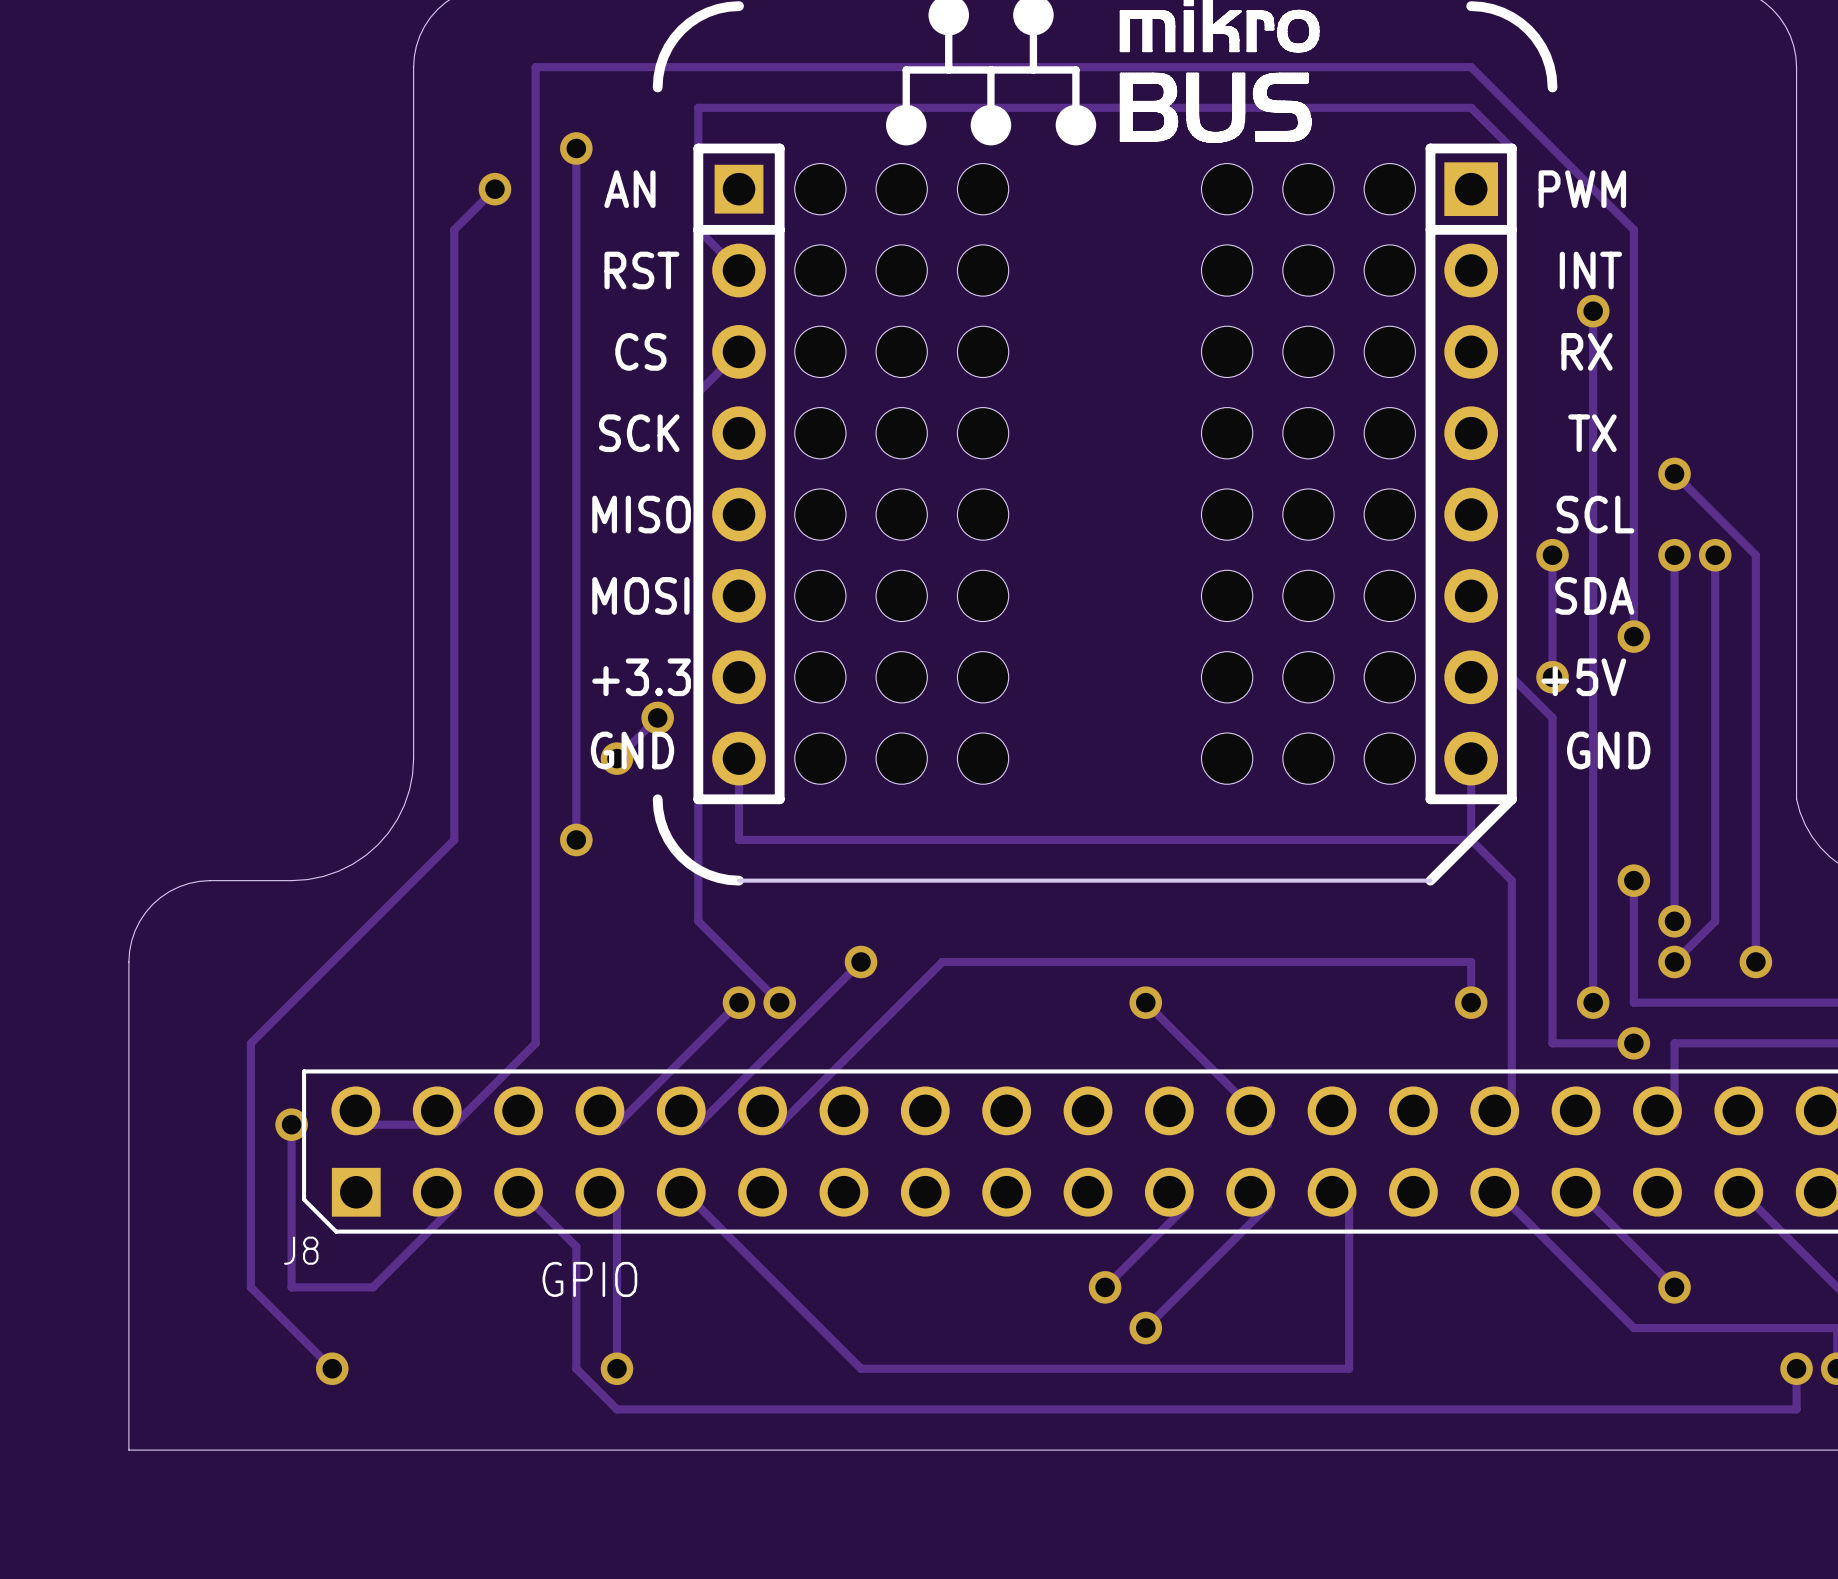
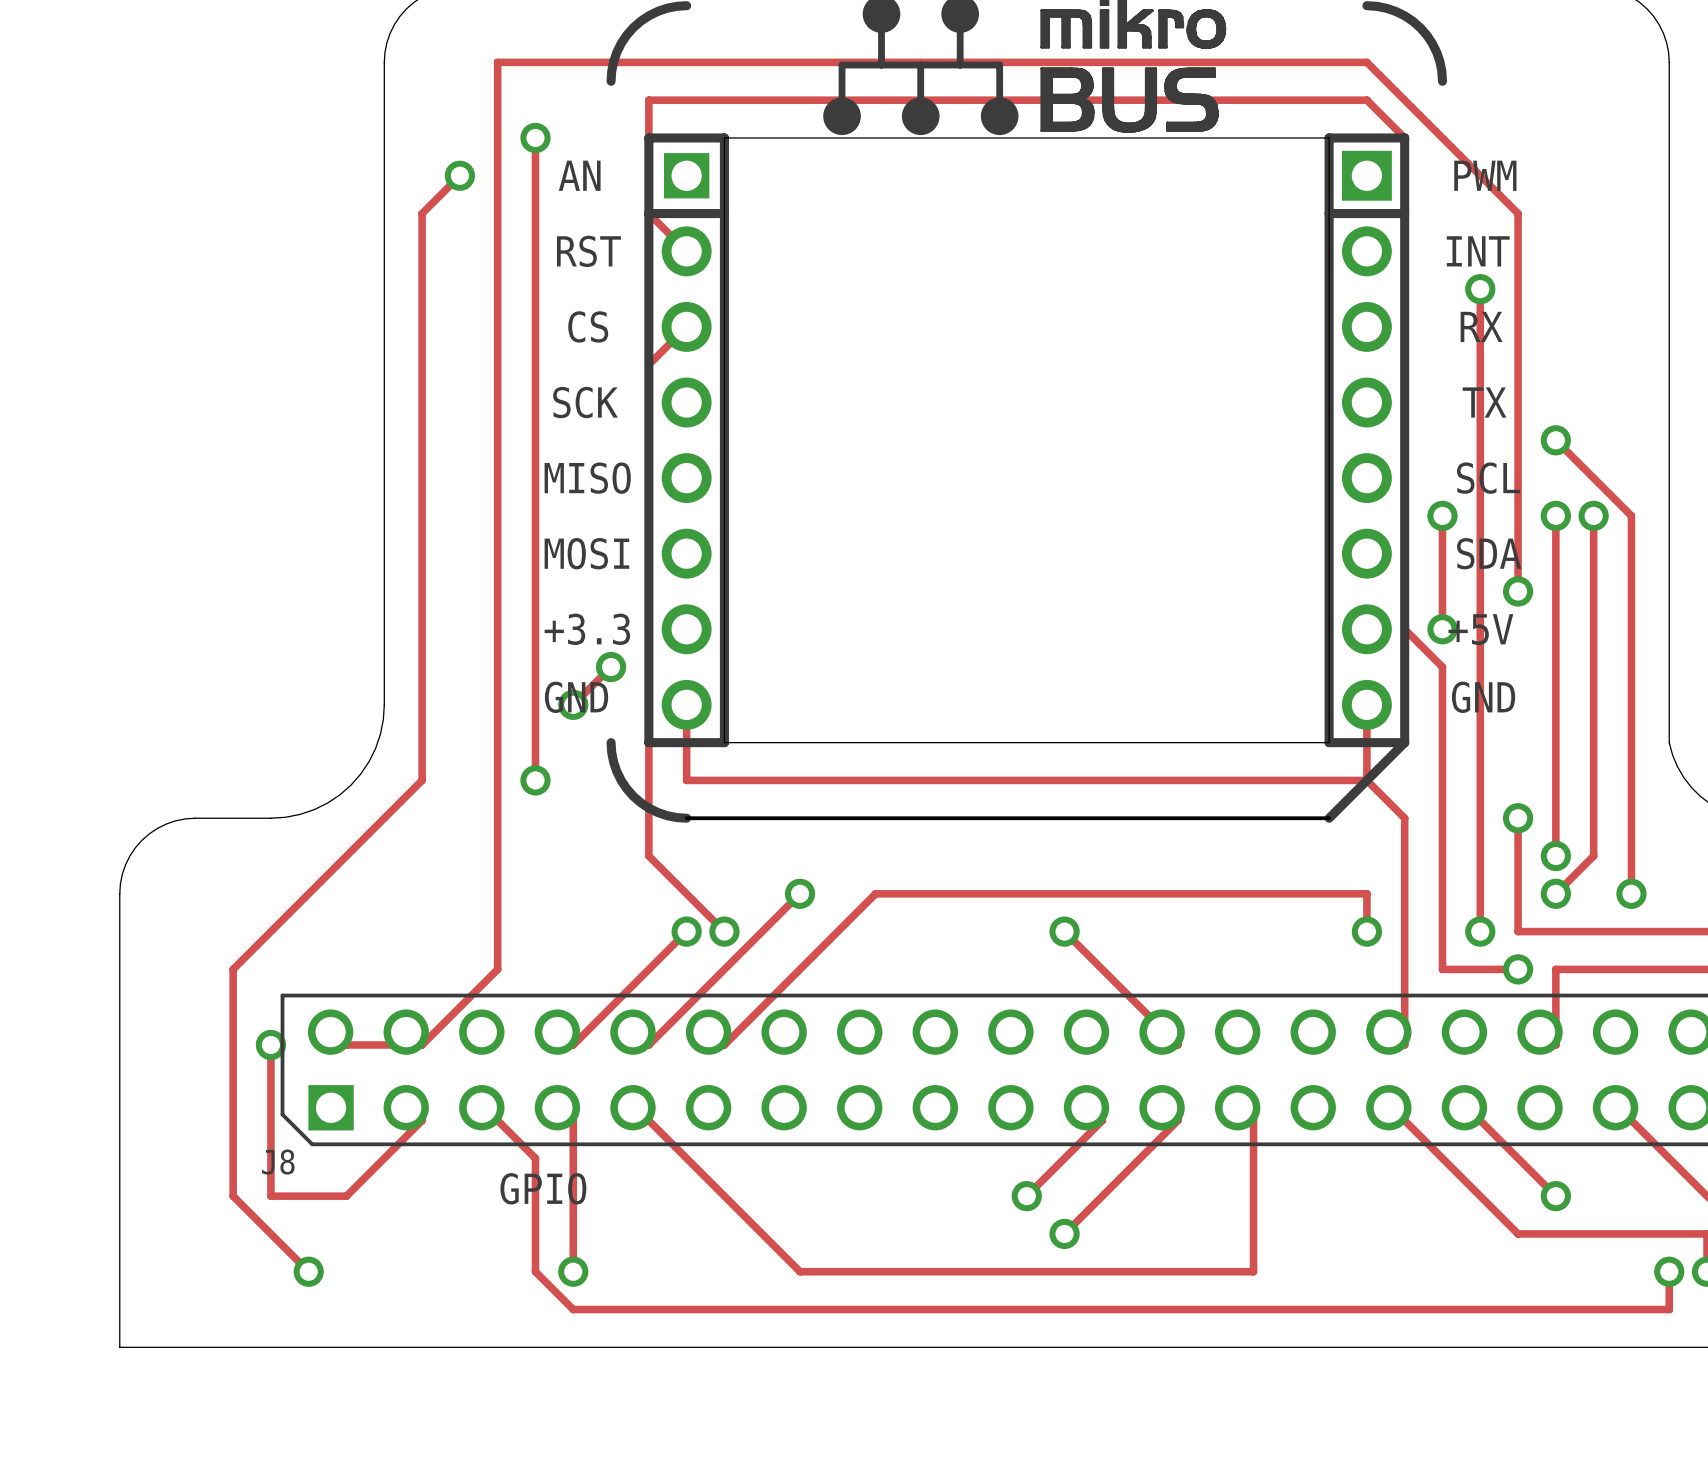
board edge: none -> (724, 137) (1329, 137) (1329, 742) (724, 742) (724, 137)
hole: (820, 189) -> none
hole: (901, 189) -> none
hole: (983, 189) -> none
hole: (1227, 189) -> none
hole: (1308, 189) -> none
hole: (1389, 189) -> none
hole: (820, 270) -> none
hole: (901, 270) -> none
hole: (983, 270) -> none
hole: (1227, 270) -> none
hole: (1308, 270) -> none
hole: (1389, 270) -> none
hole: (820, 351) -> none
hole: (901, 351) -> none
hole: (983, 351) -> none
hole: (1227, 351) -> none
hole: (1308, 351) -> none
hole: (1389, 351) -> none
hole: (820, 433) -> none
hole: (901, 433) -> none
hole: (983, 433) -> none
hole: (1227, 433) -> none
hole: (1308, 433) -> none
hole: (1389, 433) -> none
hole: (820, 514) -> none
hole: (901, 514) -> none
hole: (983, 514) -> none
hole: (1227, 514) -> none
hole: (1308, 514) -> none
hole: (1389, 514) -> none
hole: (820, 595) -> none
hole: (901, 595) -> none
hole: (983, 595) -> none
hole: (1227, 595) -> none
hole: (1308, 595) -> none
hole: (1389, 595) -> none
hole: (820, 677) -> none
hole: (901, 677) -> none
hole: (983, 677) -> none
hole: (1227, 677) -> none
hole: (1308, 677) -> none
hole: (1389, 677) -> none
hole: (820, 758) -> none
hole: (901, 758) -> none
hole: (983, 758) -> none
hole: (1227, 758) -> none
hole: (1308, 758) -> none
hole: (1389, 758) -> none

